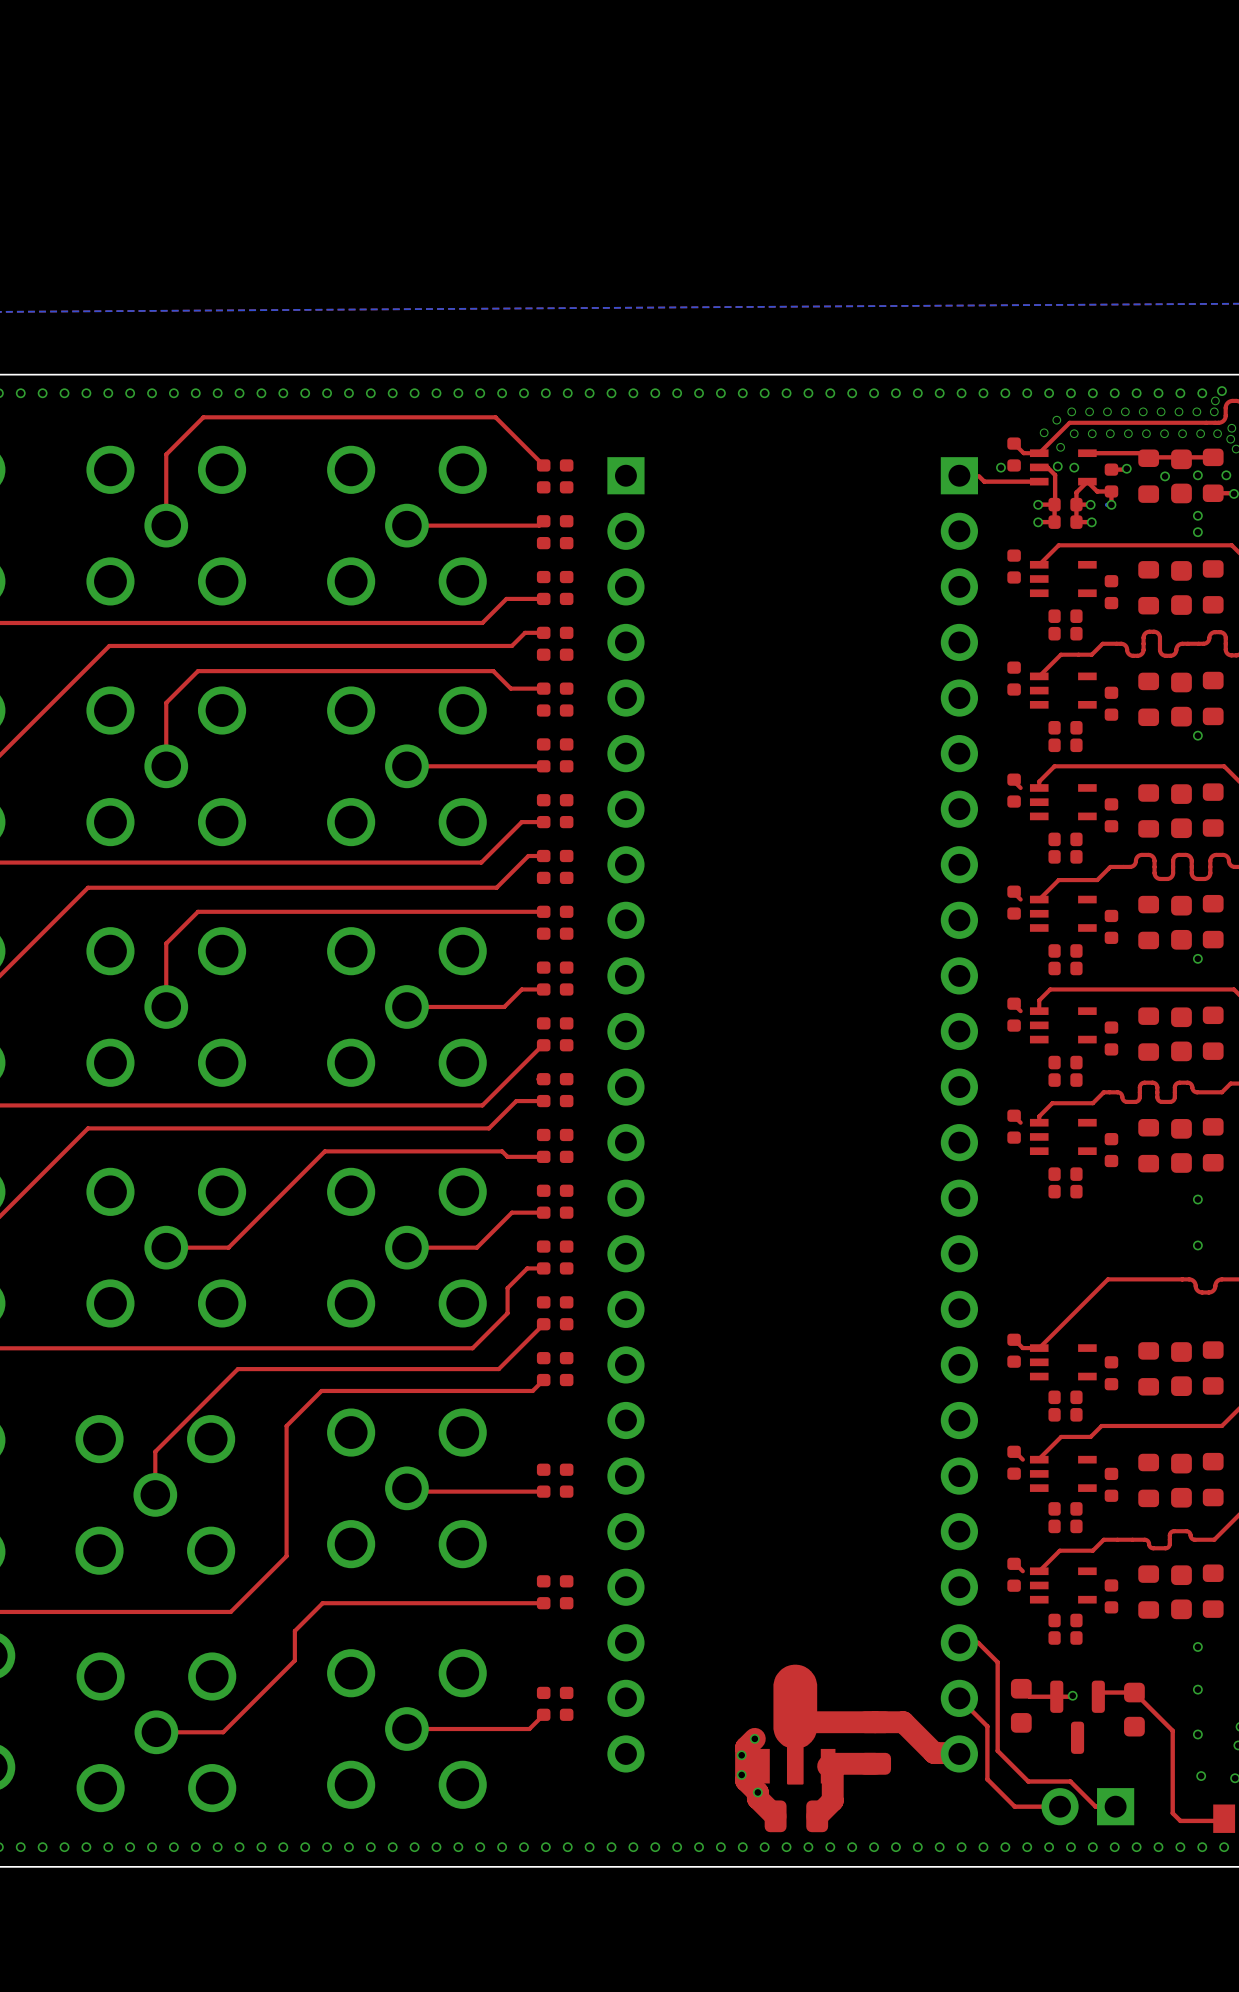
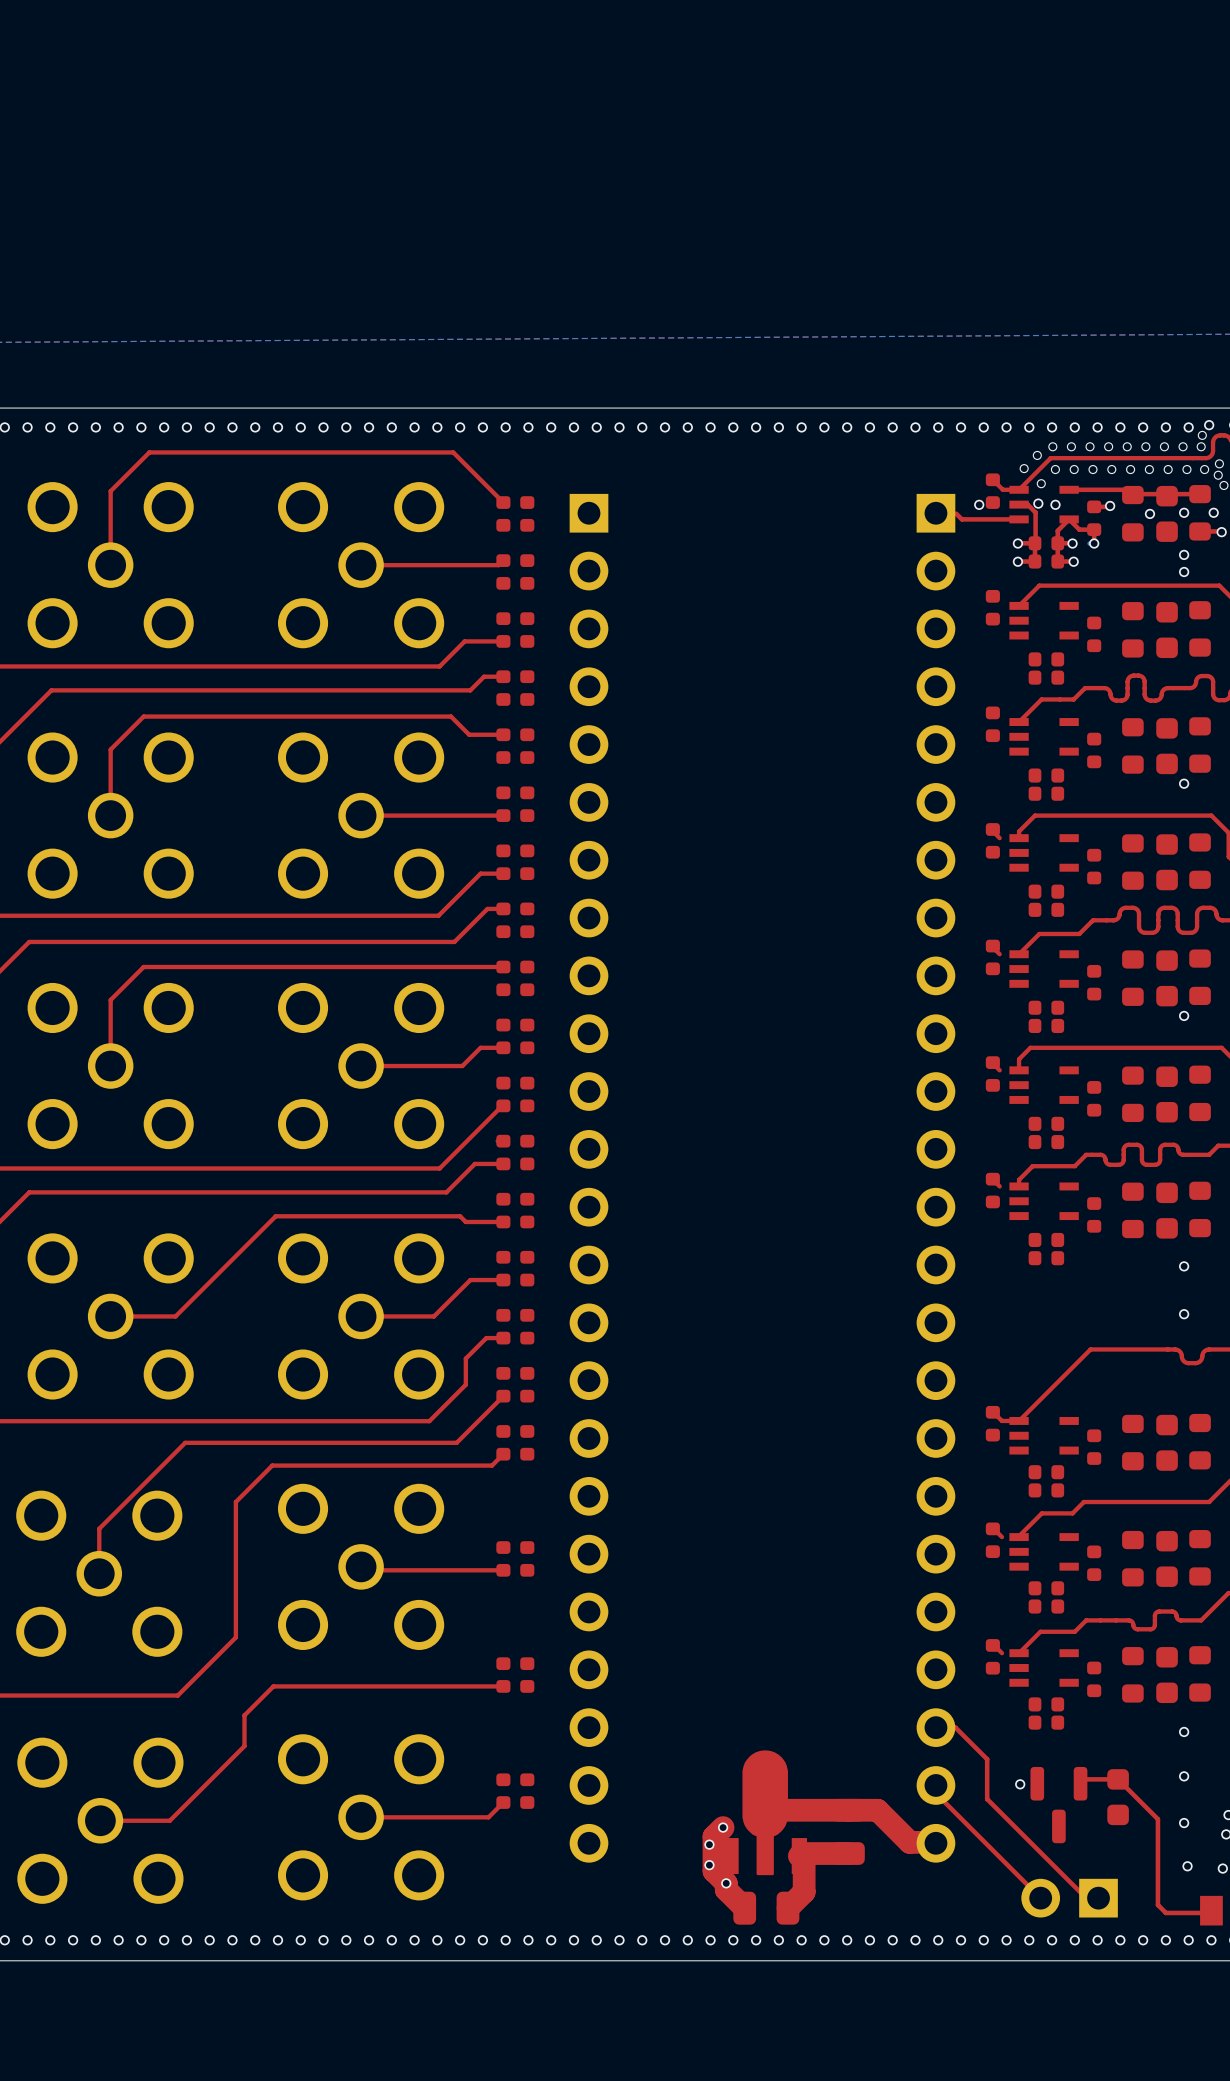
top track: (997, 1662) (997, 1750) (1028, 1781) (1070, 1781) (1095, 1806) (1103, 1806) -> (975, 1747) (987, 1759) (987, 1799) (1086, 1898)
top track: (1021, 1688) (1029, 1696) (1072, 1695) -> none
via position: (1072, 1695) -> (1020, 1784)
top track: (959, 1698) (987, 1726) (987, 1779) (1014, 1806) (1060, 1806) -> (935, 1785) (935, 1793) (1040, 1898)
part: (1021, 1705) -> none

